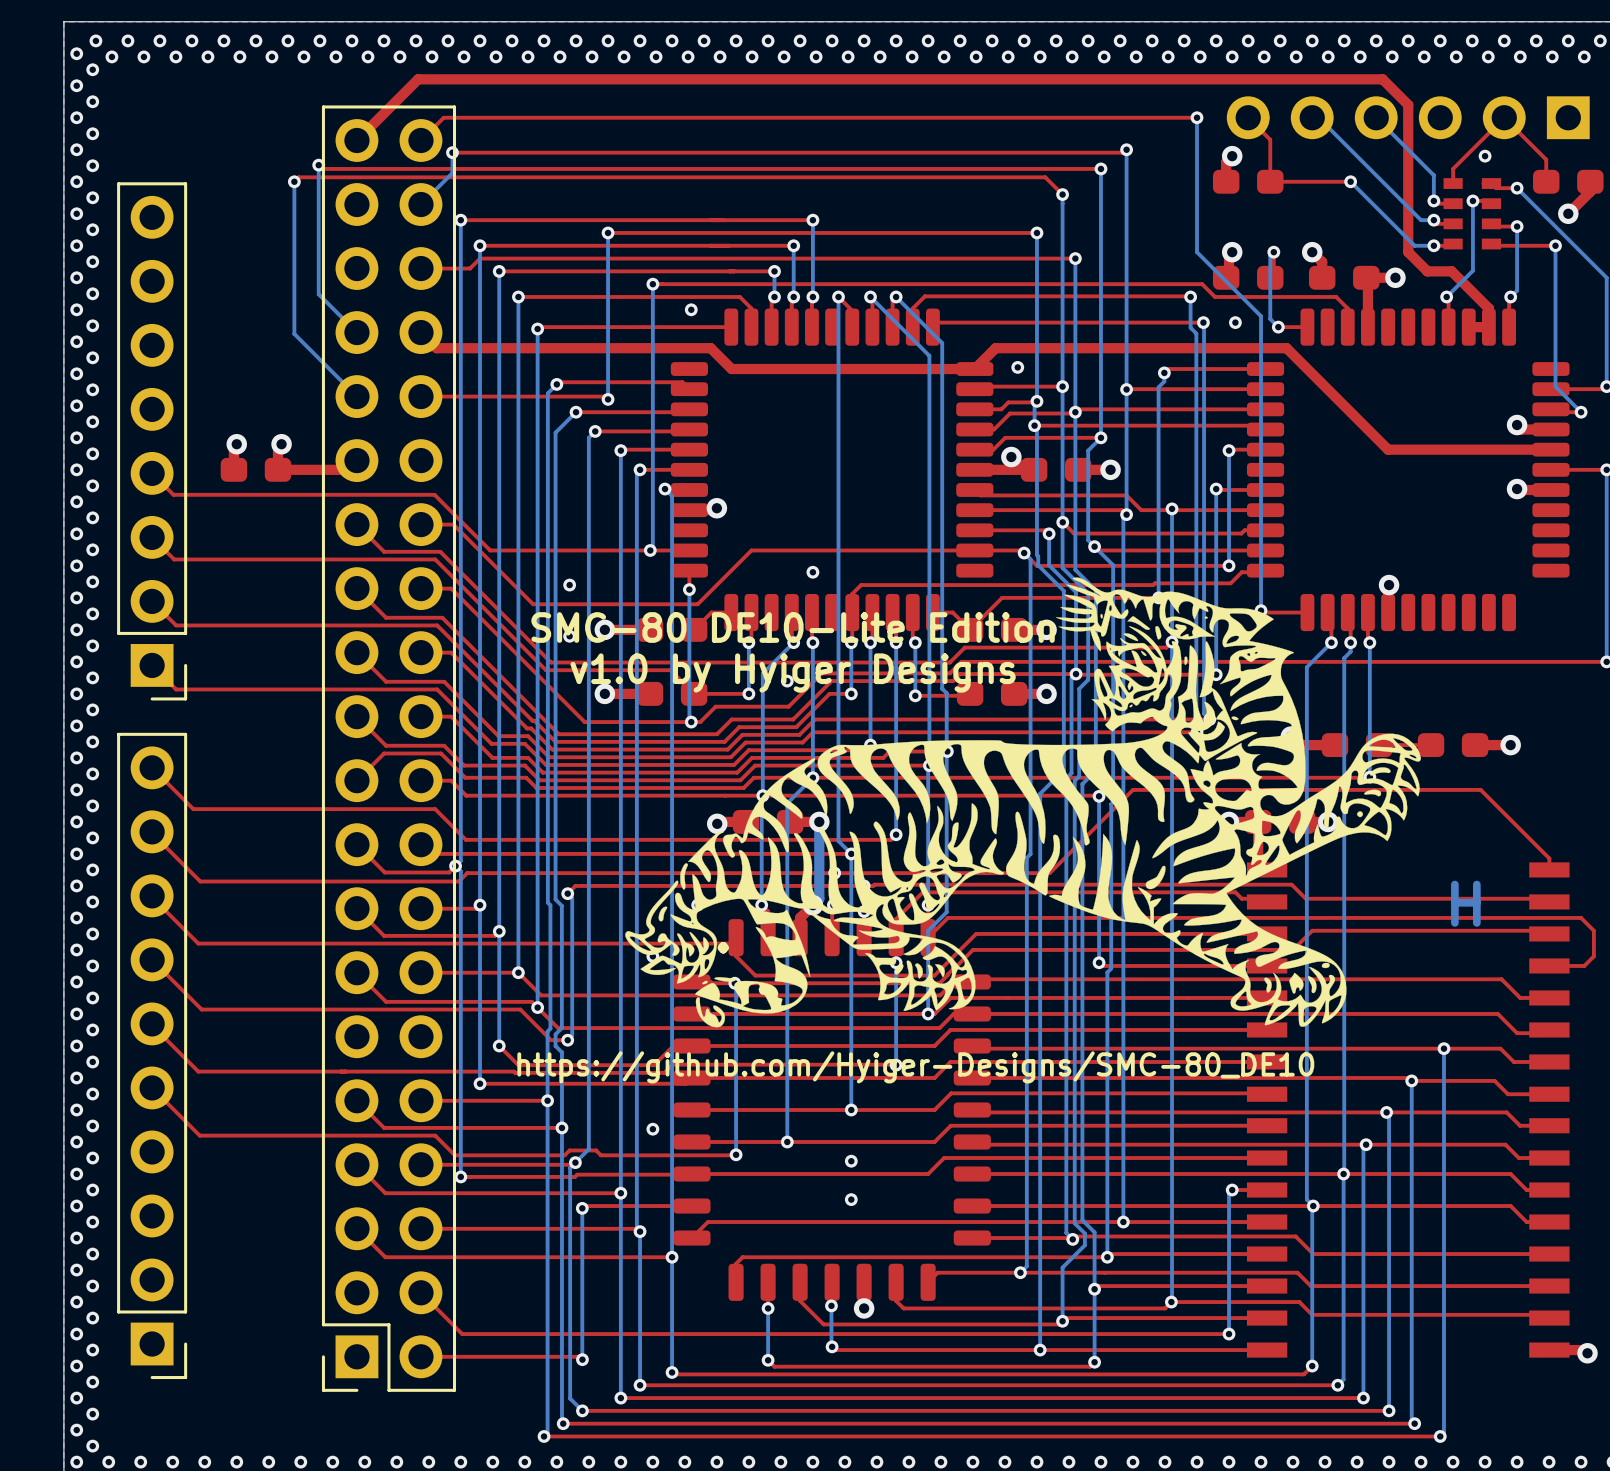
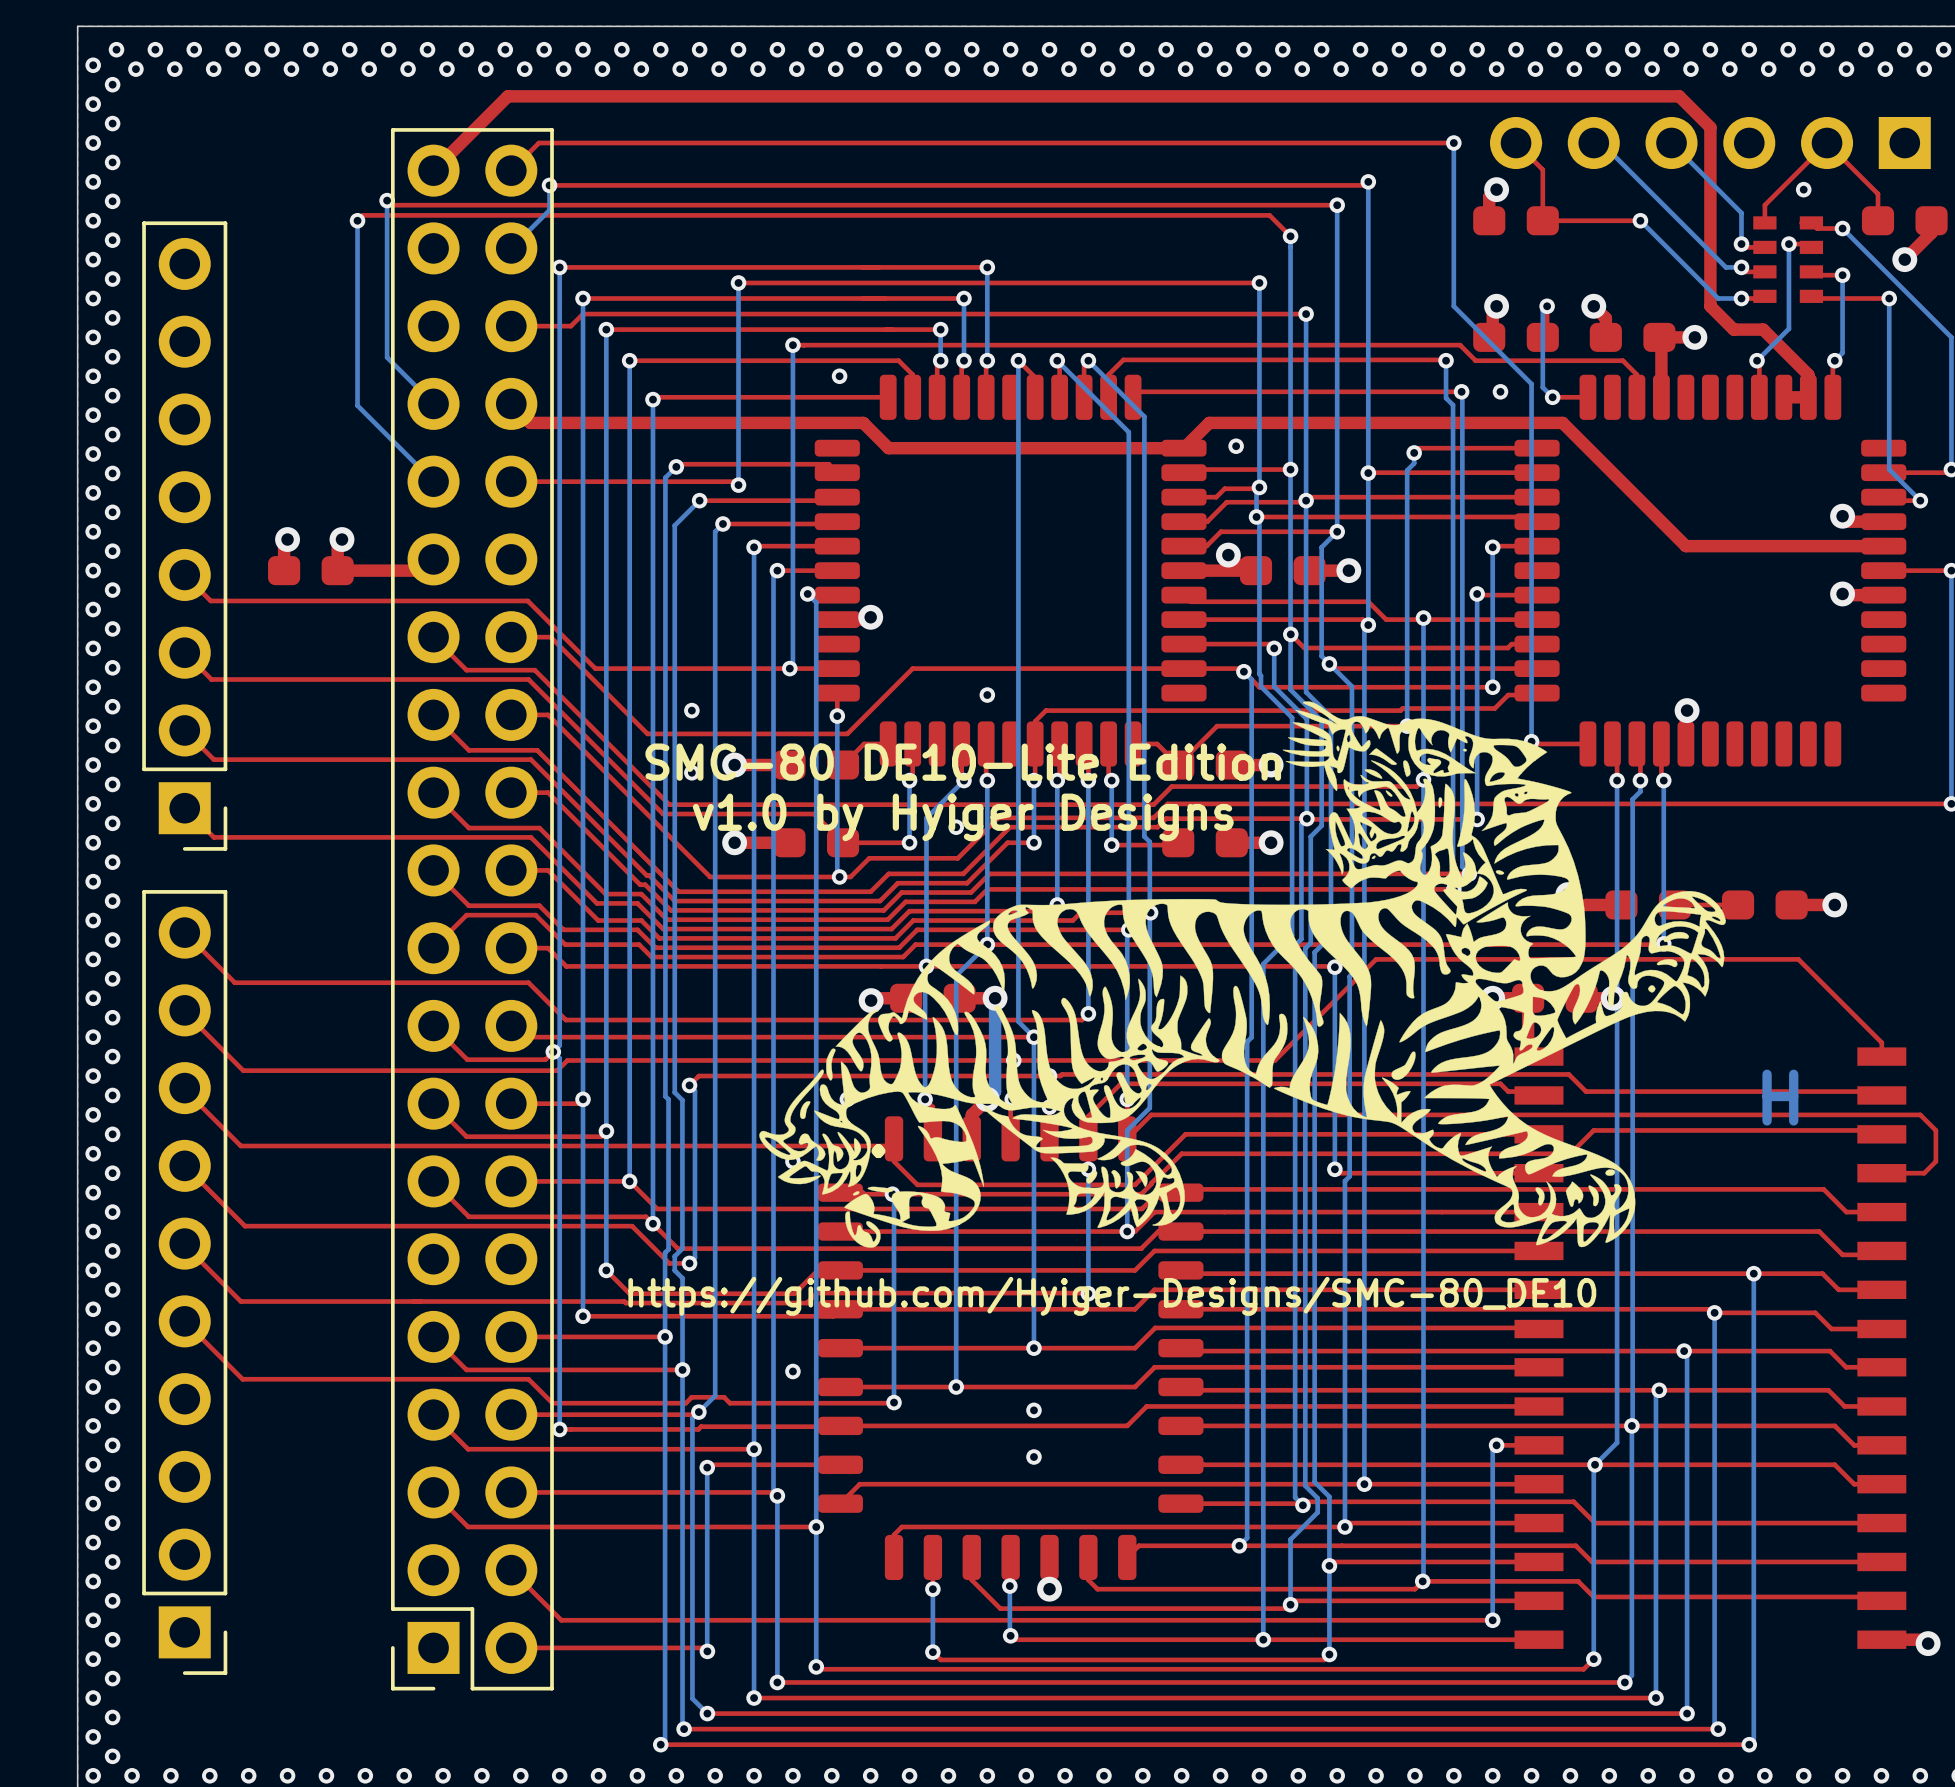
bottom track: (1331, 642) (1306, 667) (1306, 1199) (1312, 1204) -> (1617, 780) (1617, 1442) (1596, 1463) (1593, 1463)

